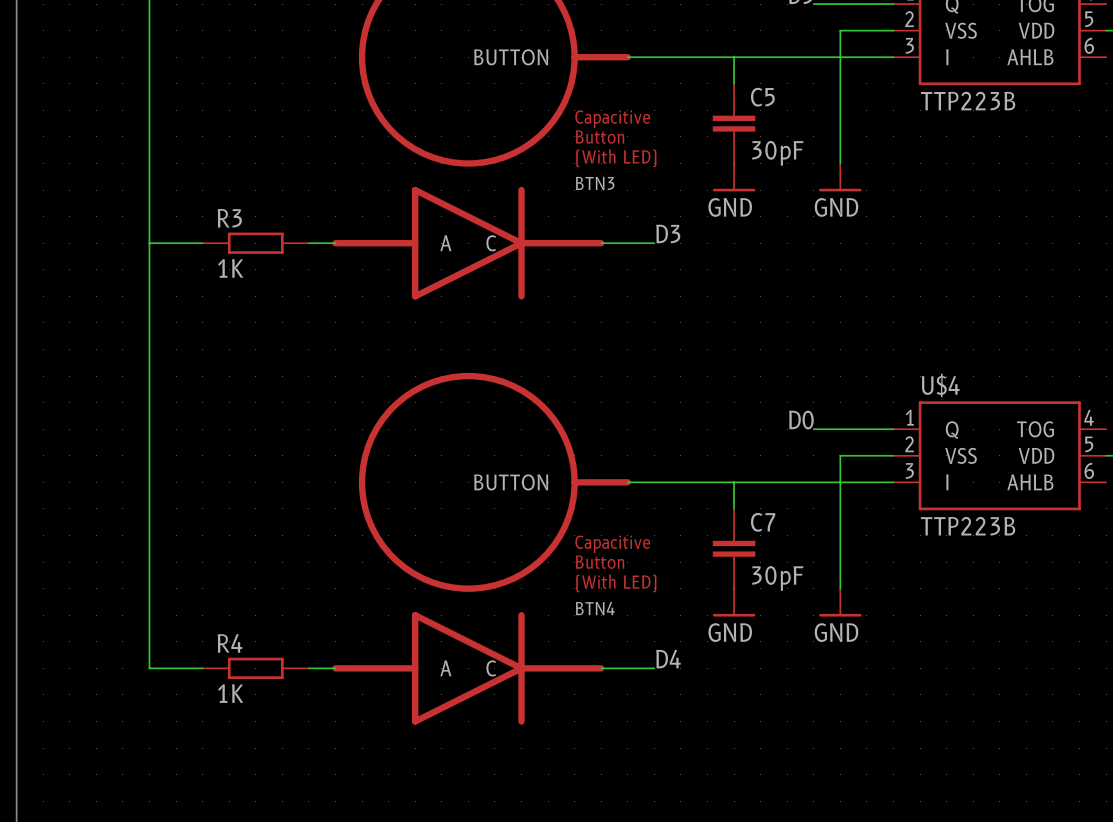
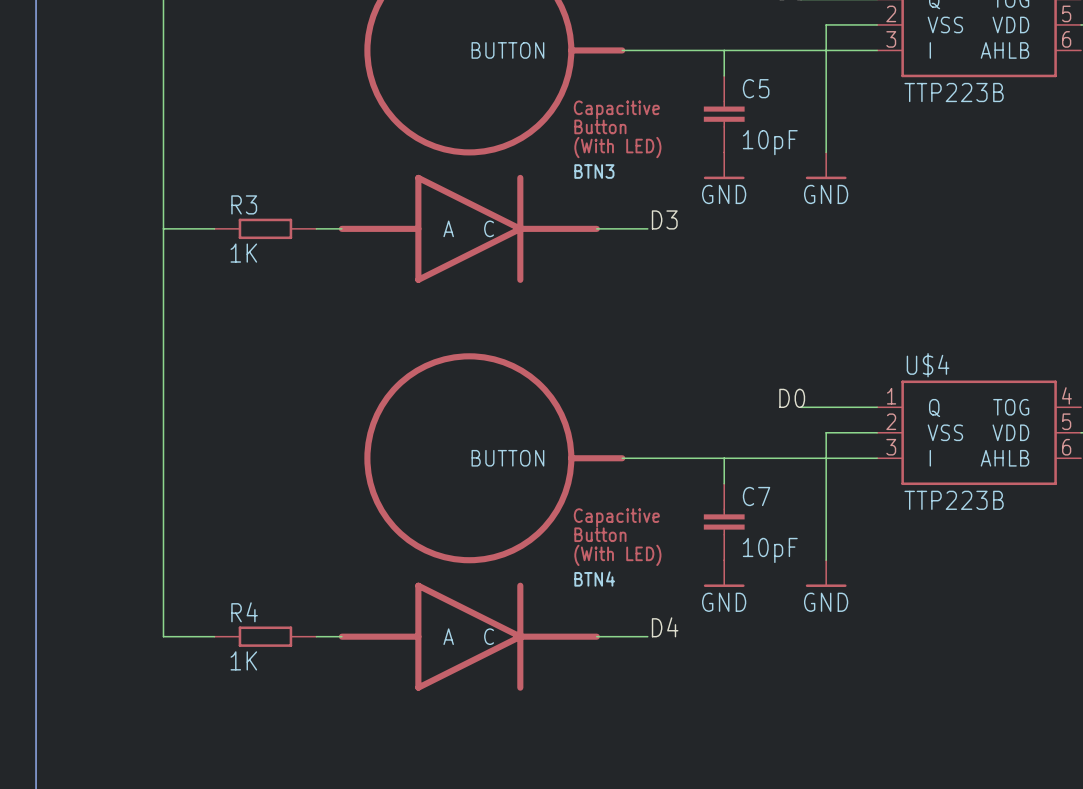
C5 value: 30pF (777, 153) -> 10pF (770, 142)
C7 value: 30pF (777, 578) -> 10pF (770, 550)

